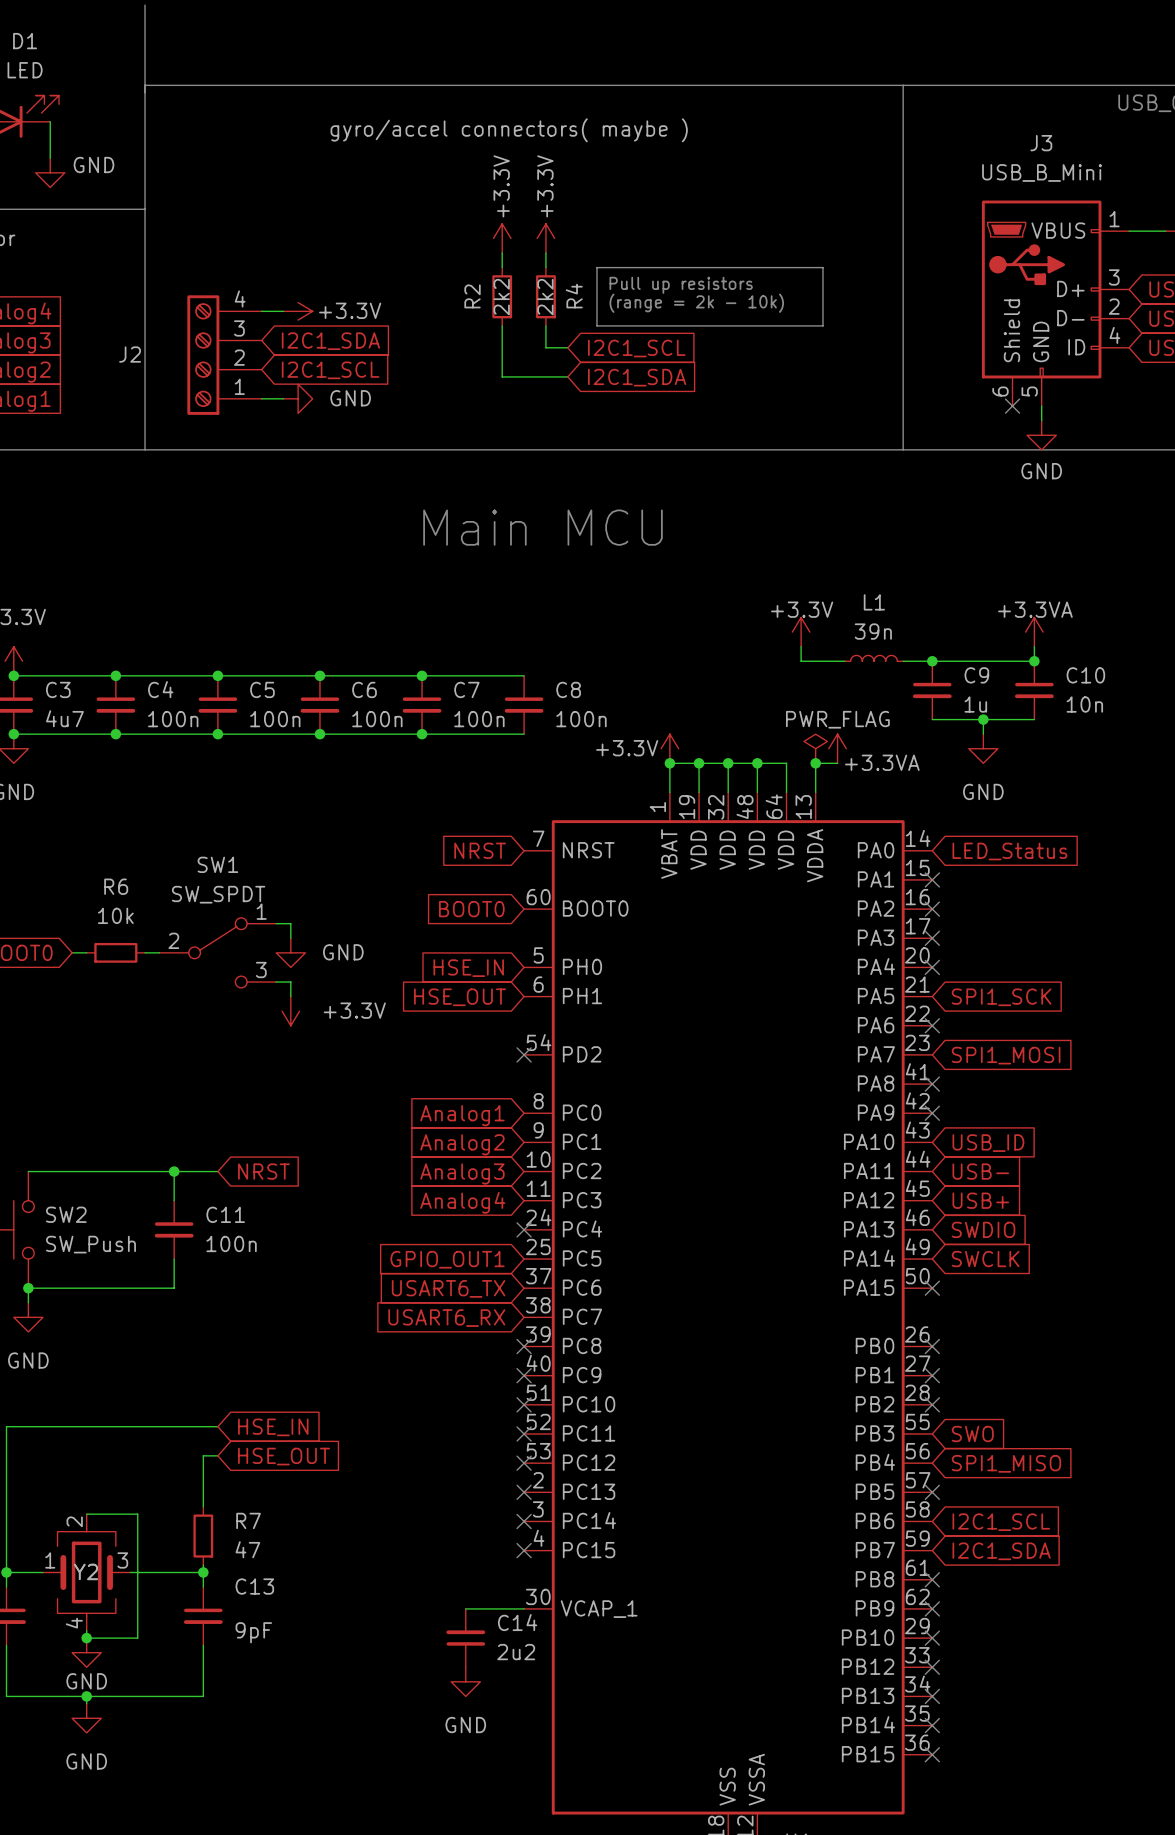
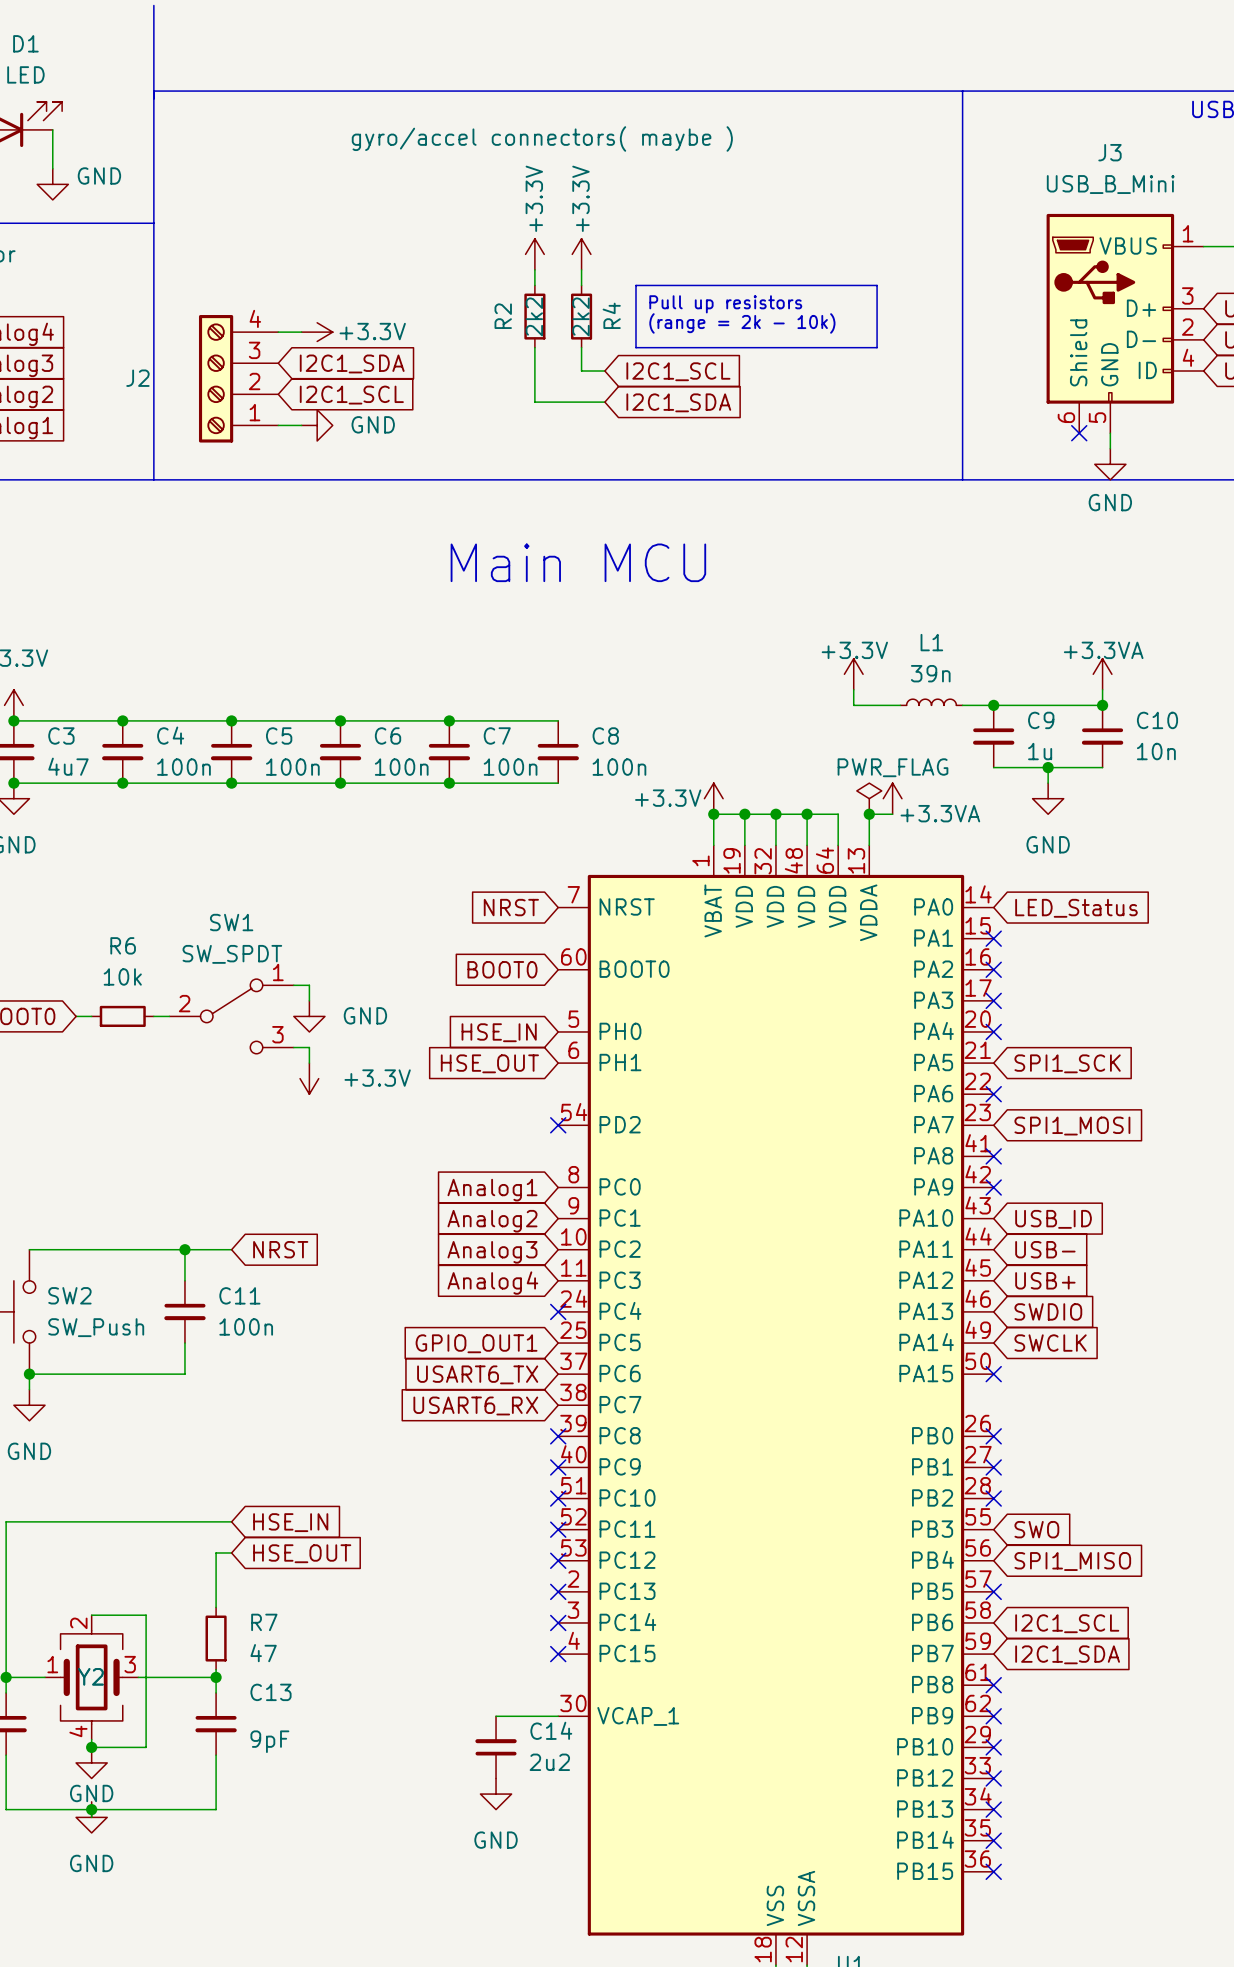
power symbol position: GND (86, 1718) -> GND (91, 1817)

